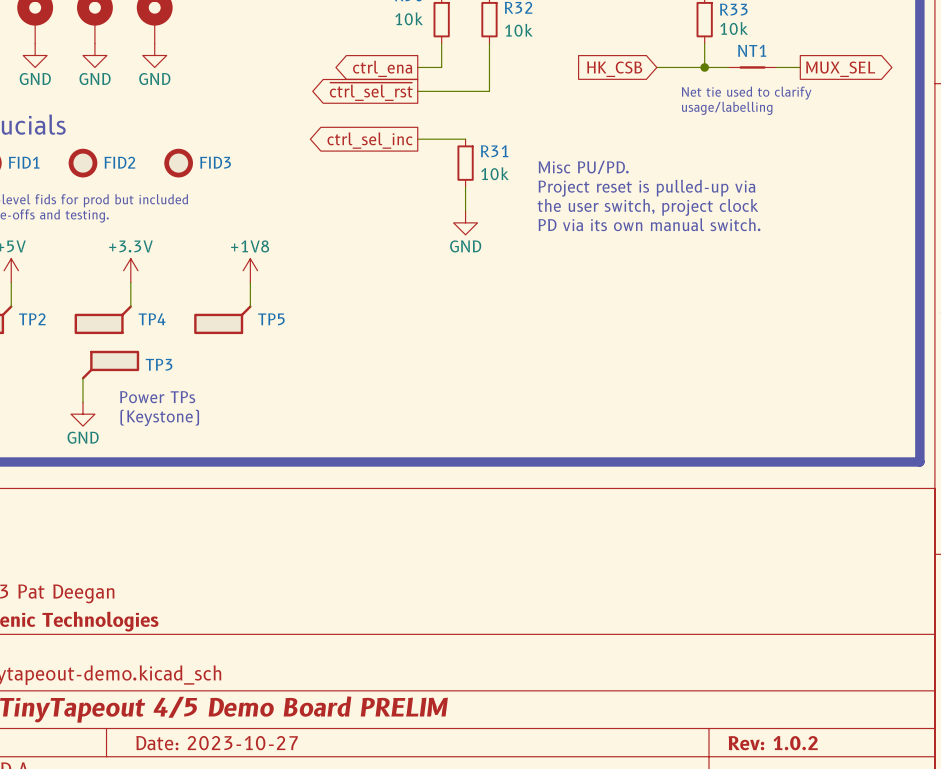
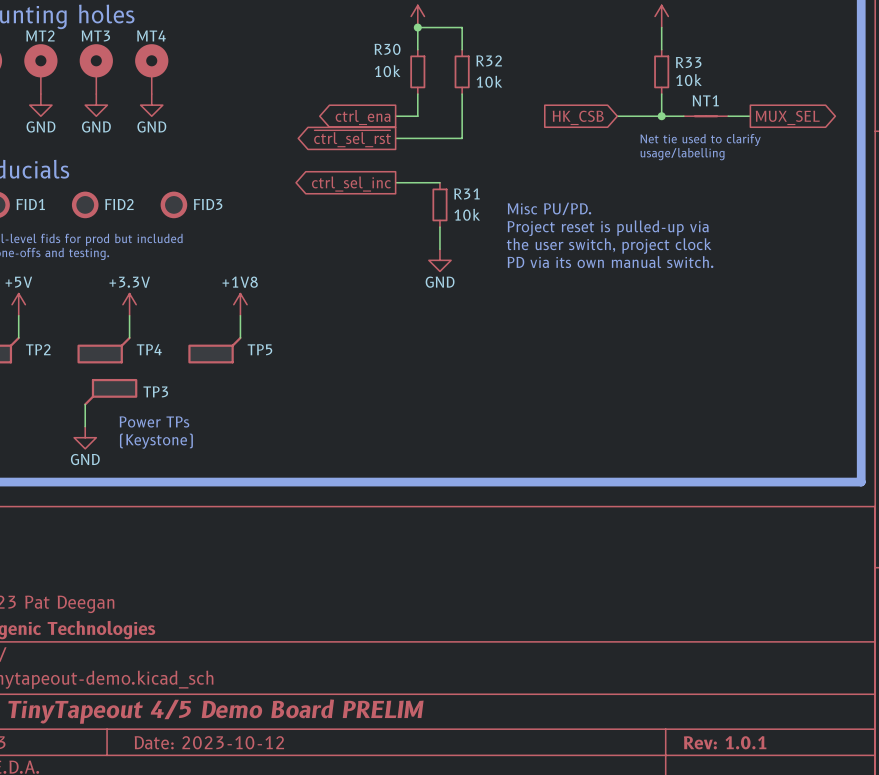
title block: Date: 2023-10-27 (217, 743) -> Date: 2023-10-12 (209, 742)
title block: Rev: 1.0.2 (773, 743) -> Rev: 1.0.1 (725, 742)

